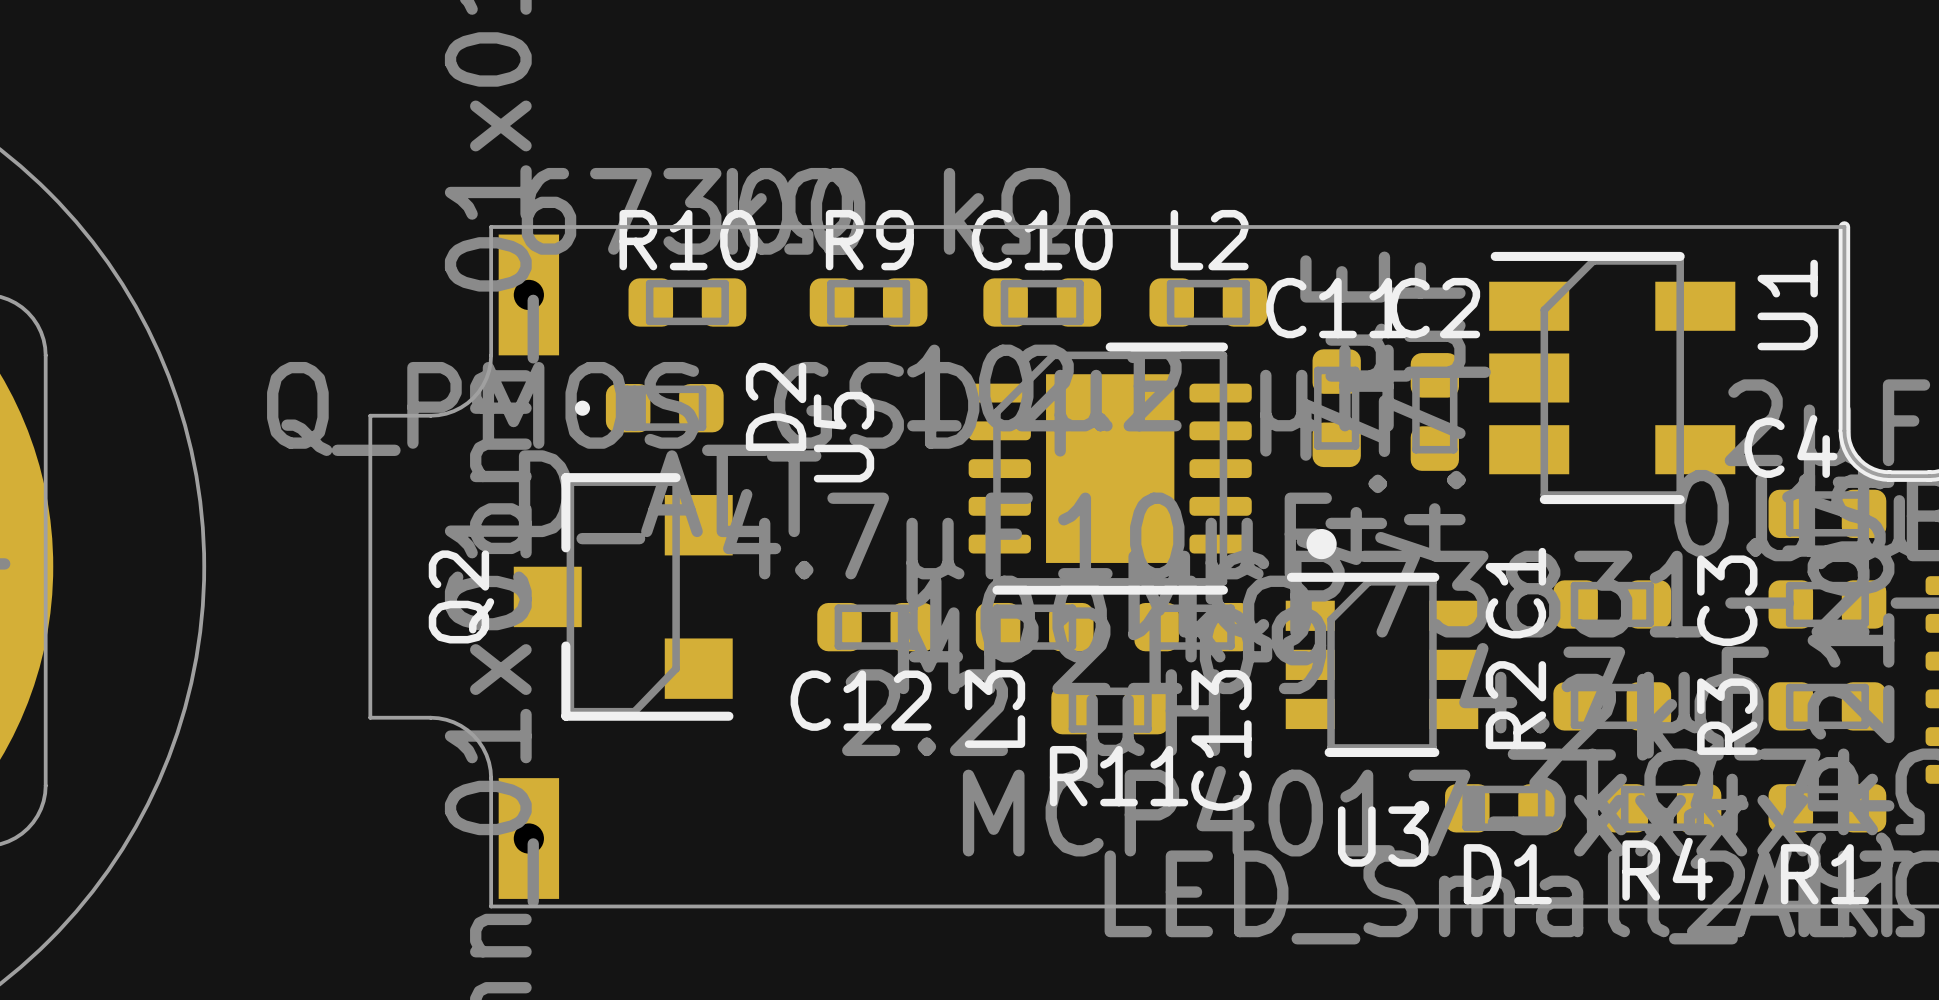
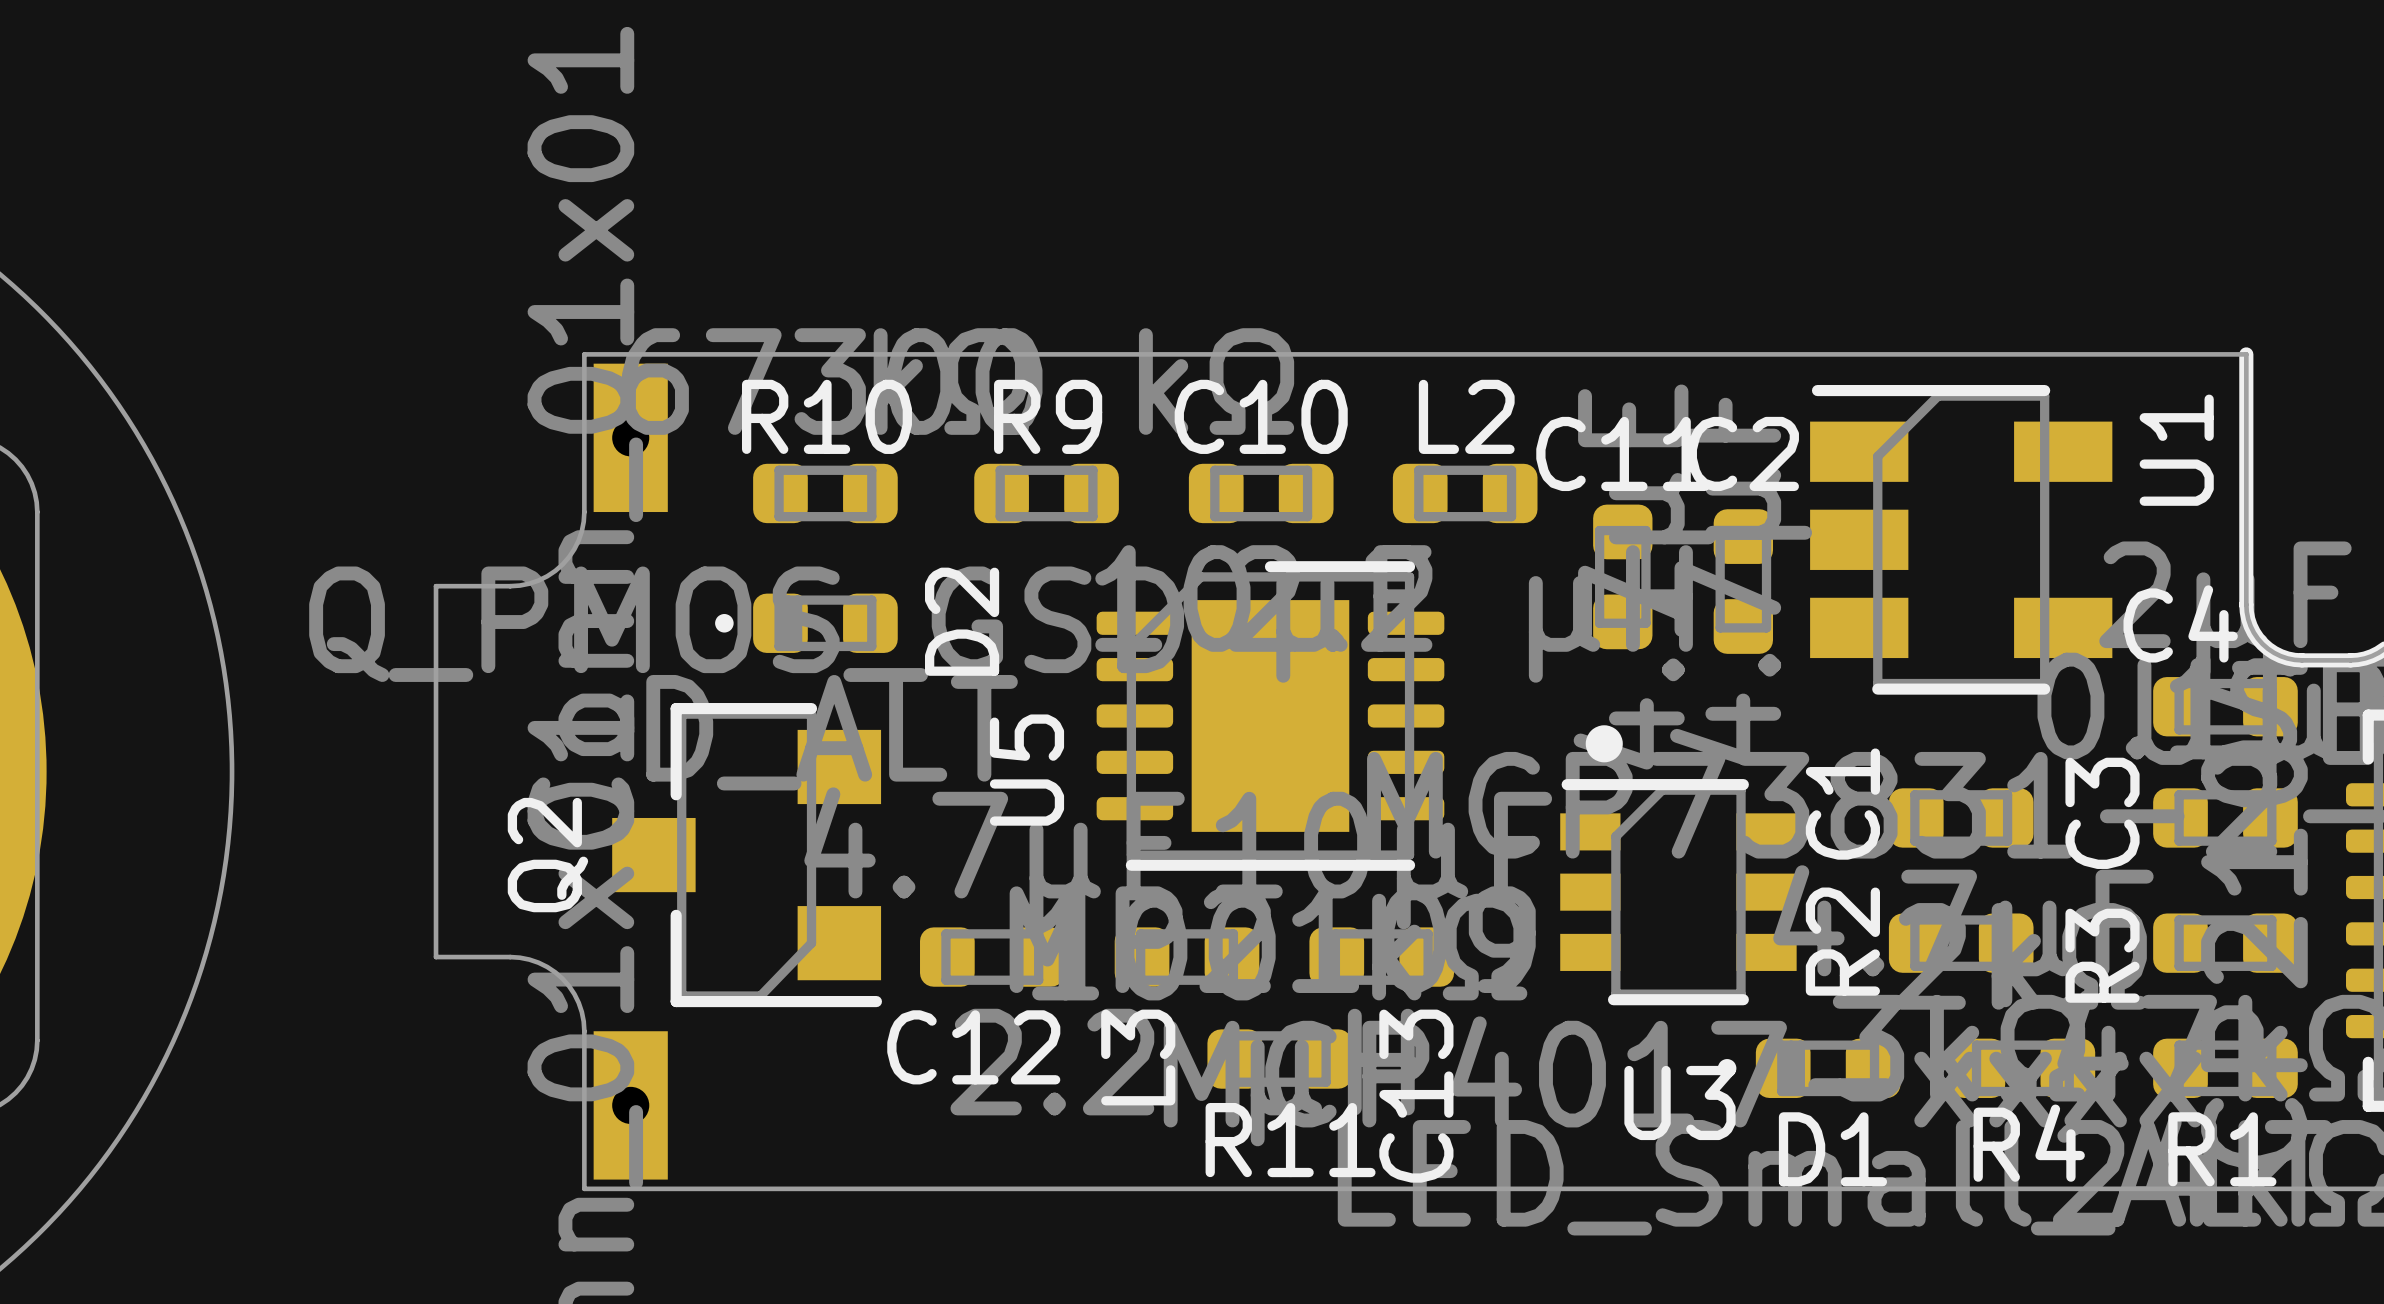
R10 position: (687, 302) -> (825, 493)
R9 position: (868, 302) -> (1046, 493)
C10 position: (1042, 302) -> (1261, 493)
L2 position: (1208, 302) -> (1465, 493)
D2 position: (649, 408) -> (806, 623)
U5 name position: U5 (843, 437) -> U5 (1026, 770)
U5 position: (1110, 468) -> (1270, 715)
Q2 position: (623, 596) -> (747, 855)
C12 position: (876, 627) -> (992, 957)
L3 position: (1034, 627) -> (1187, 957)
C13 position: (1193, 627) -> (1381, 957)
R11 position: (1110, 710) -> (1279, 1059)

